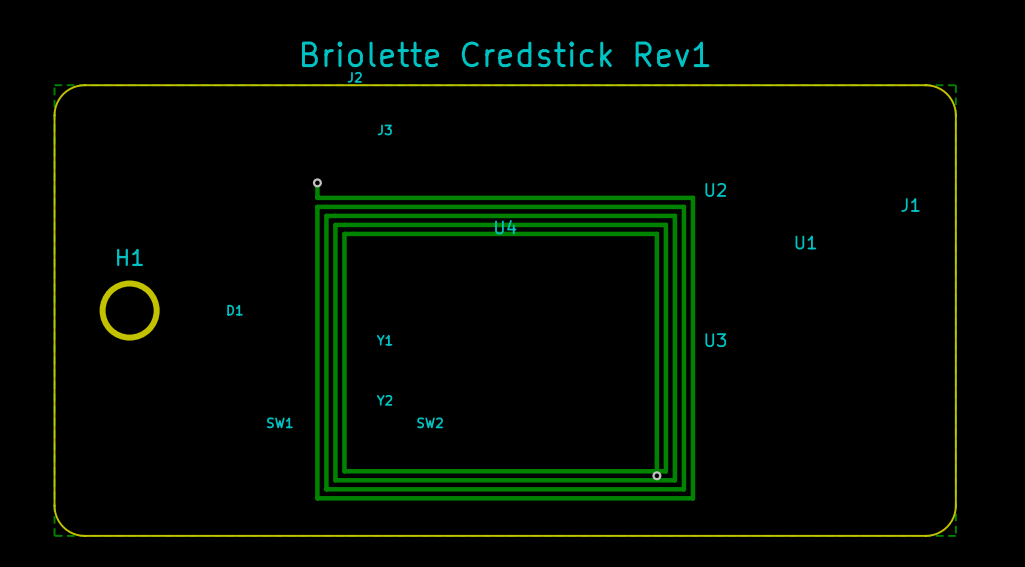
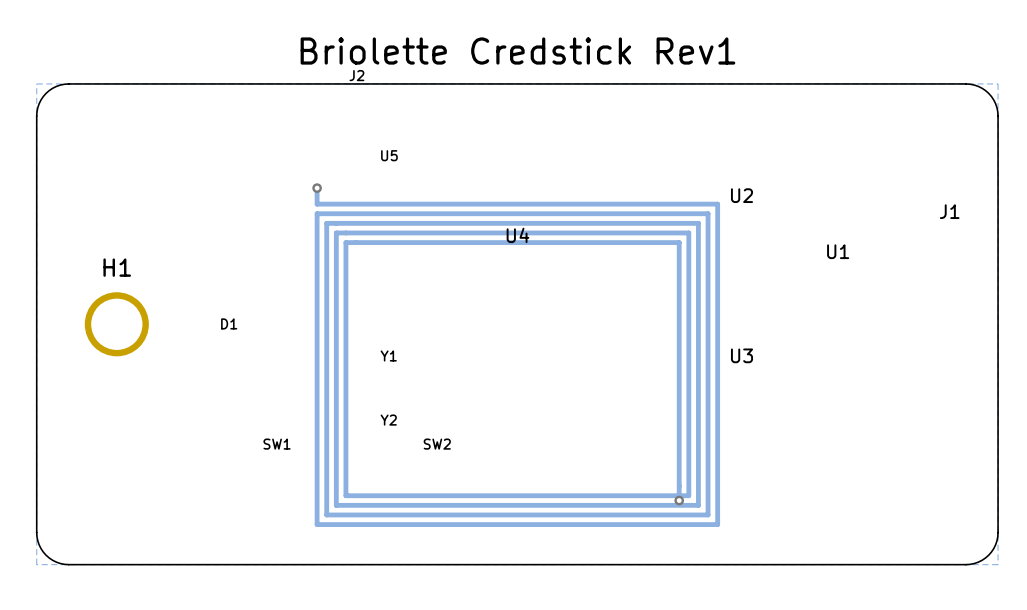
J3: (384, 129) -> none
U5: none -> (389, 155)

